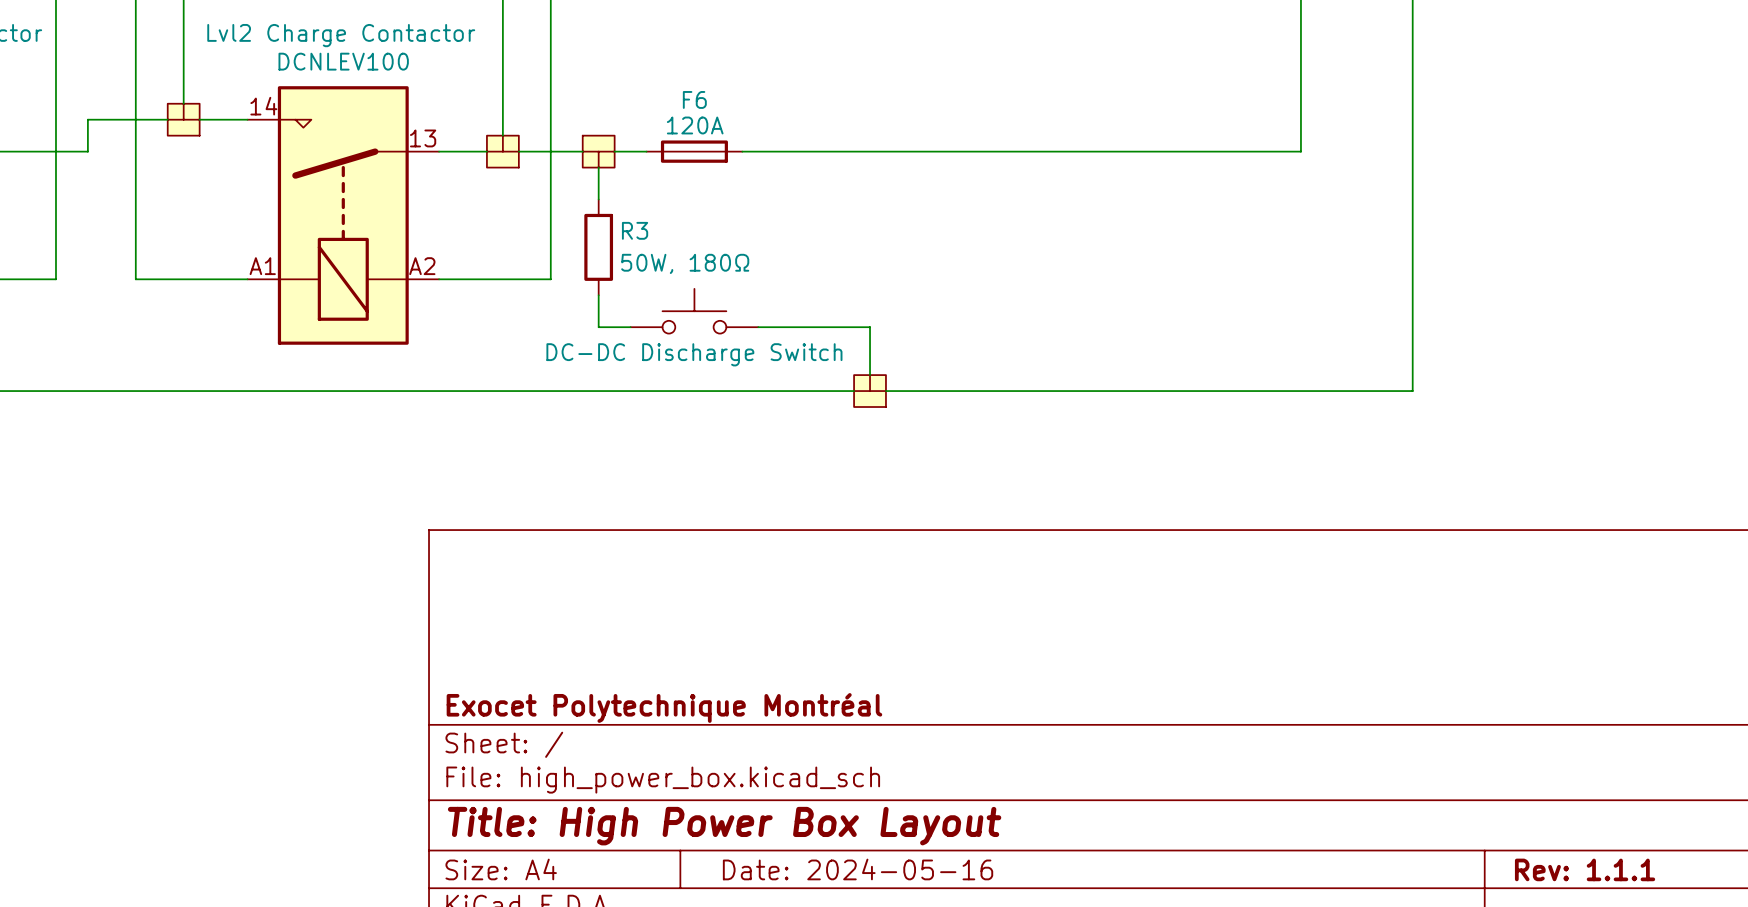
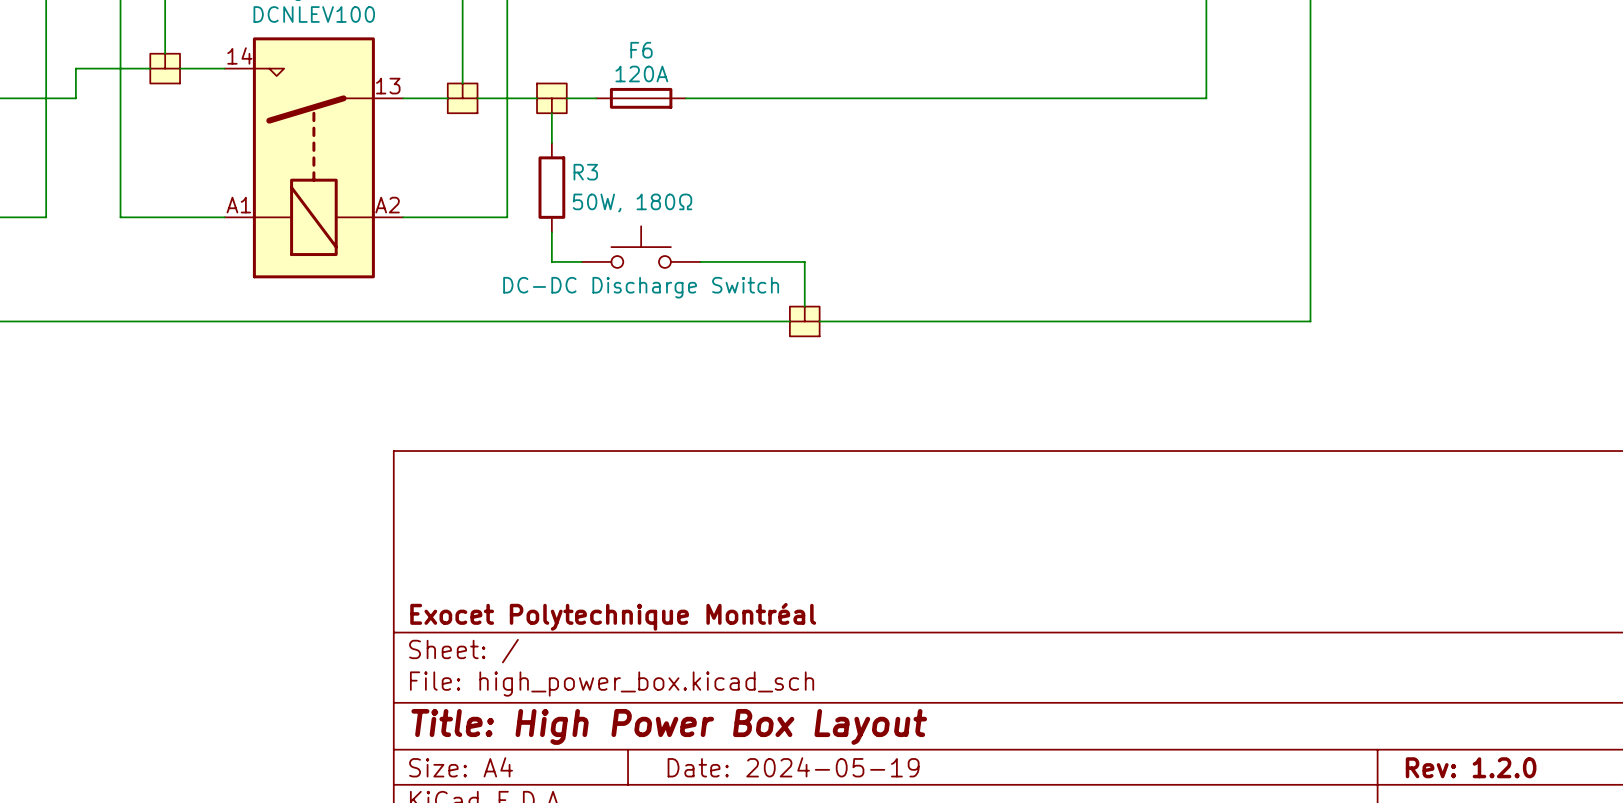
title block: Date: 2024-05-16 (858, 869) -> Date: 2024-05-19 (793, 767)
title block: Rev: 1.1.1 (1585, 869) -> Rev: 1.2.0 (1471, 767)

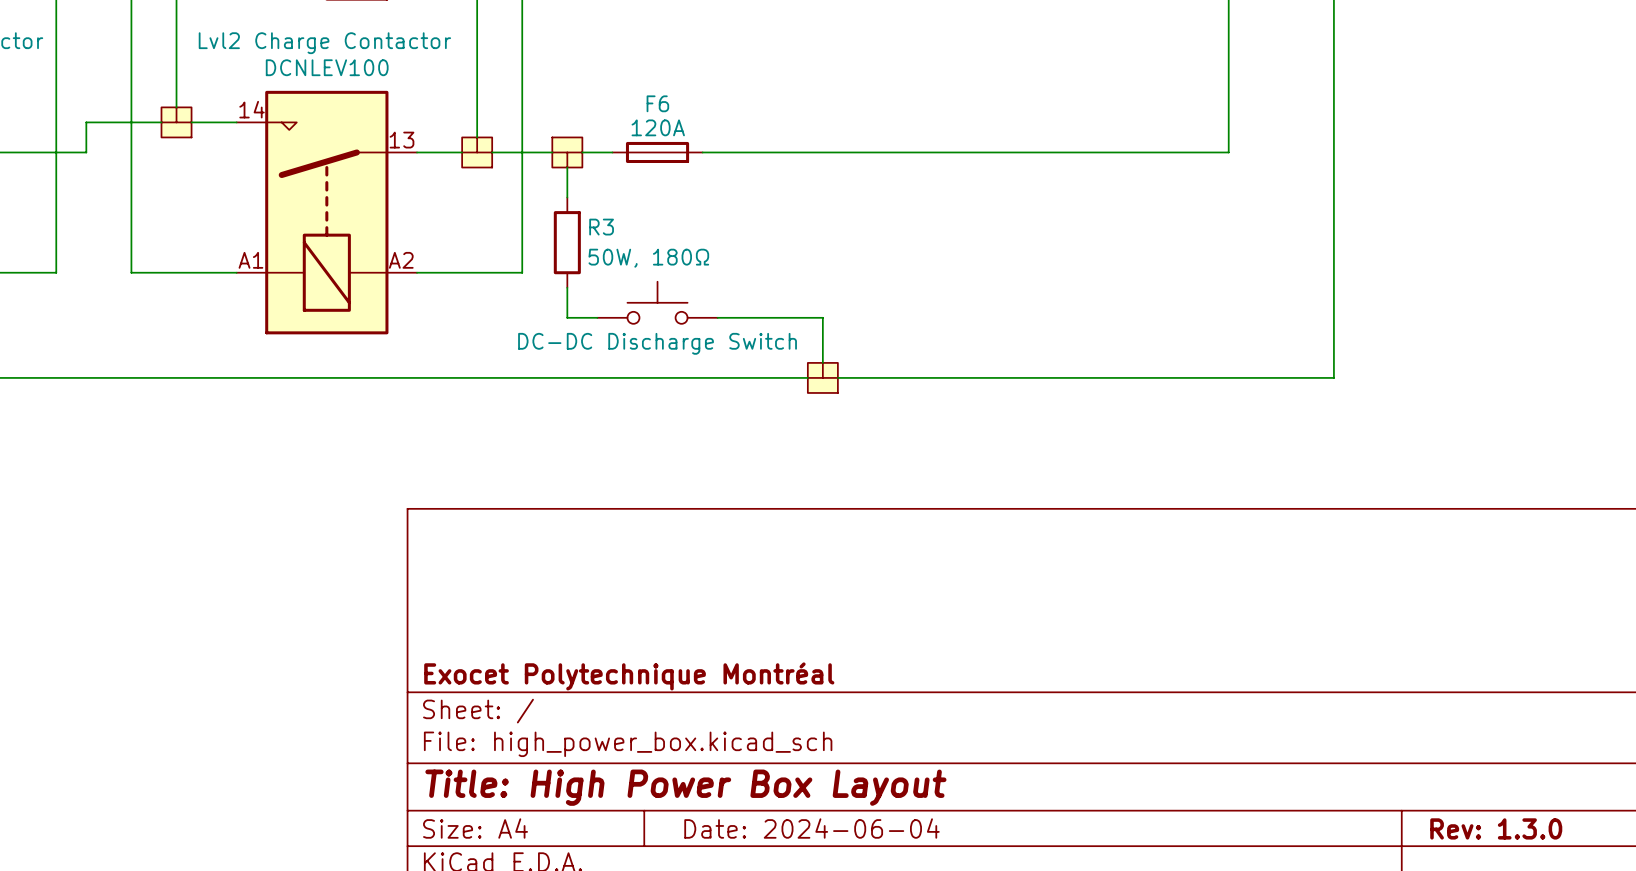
title block: Date: 2024-05-19 (793, 767) -> Date: 2024-06-04 (812, 828)
title block: Rev: 1.2.0 (1471, 767) -> Rev: 1.3.0 (1496, 828)

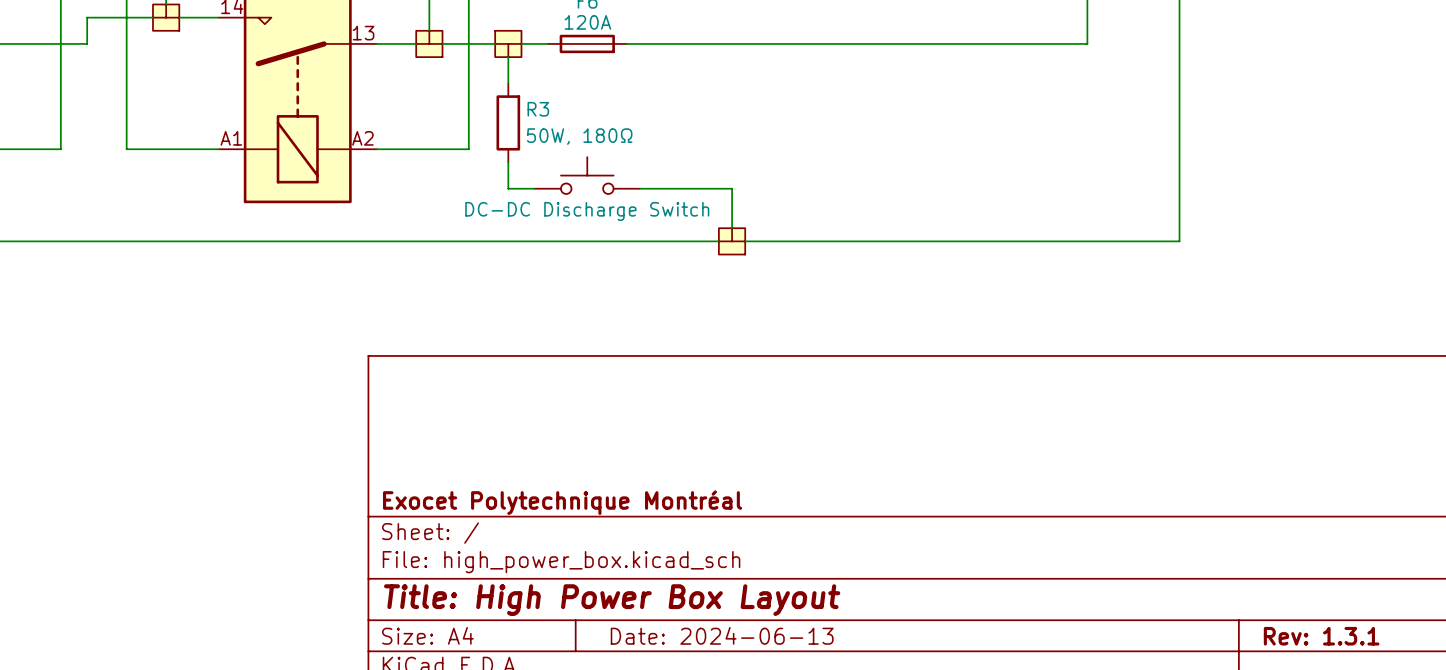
title block: Date: 2024-06-04 (812, 828) -> Date: 2024-06-13 (722, 635)
title block: Rev: 1.3.0 (1496, 828) -> Rev: 1.3.1 (1321, 636)

